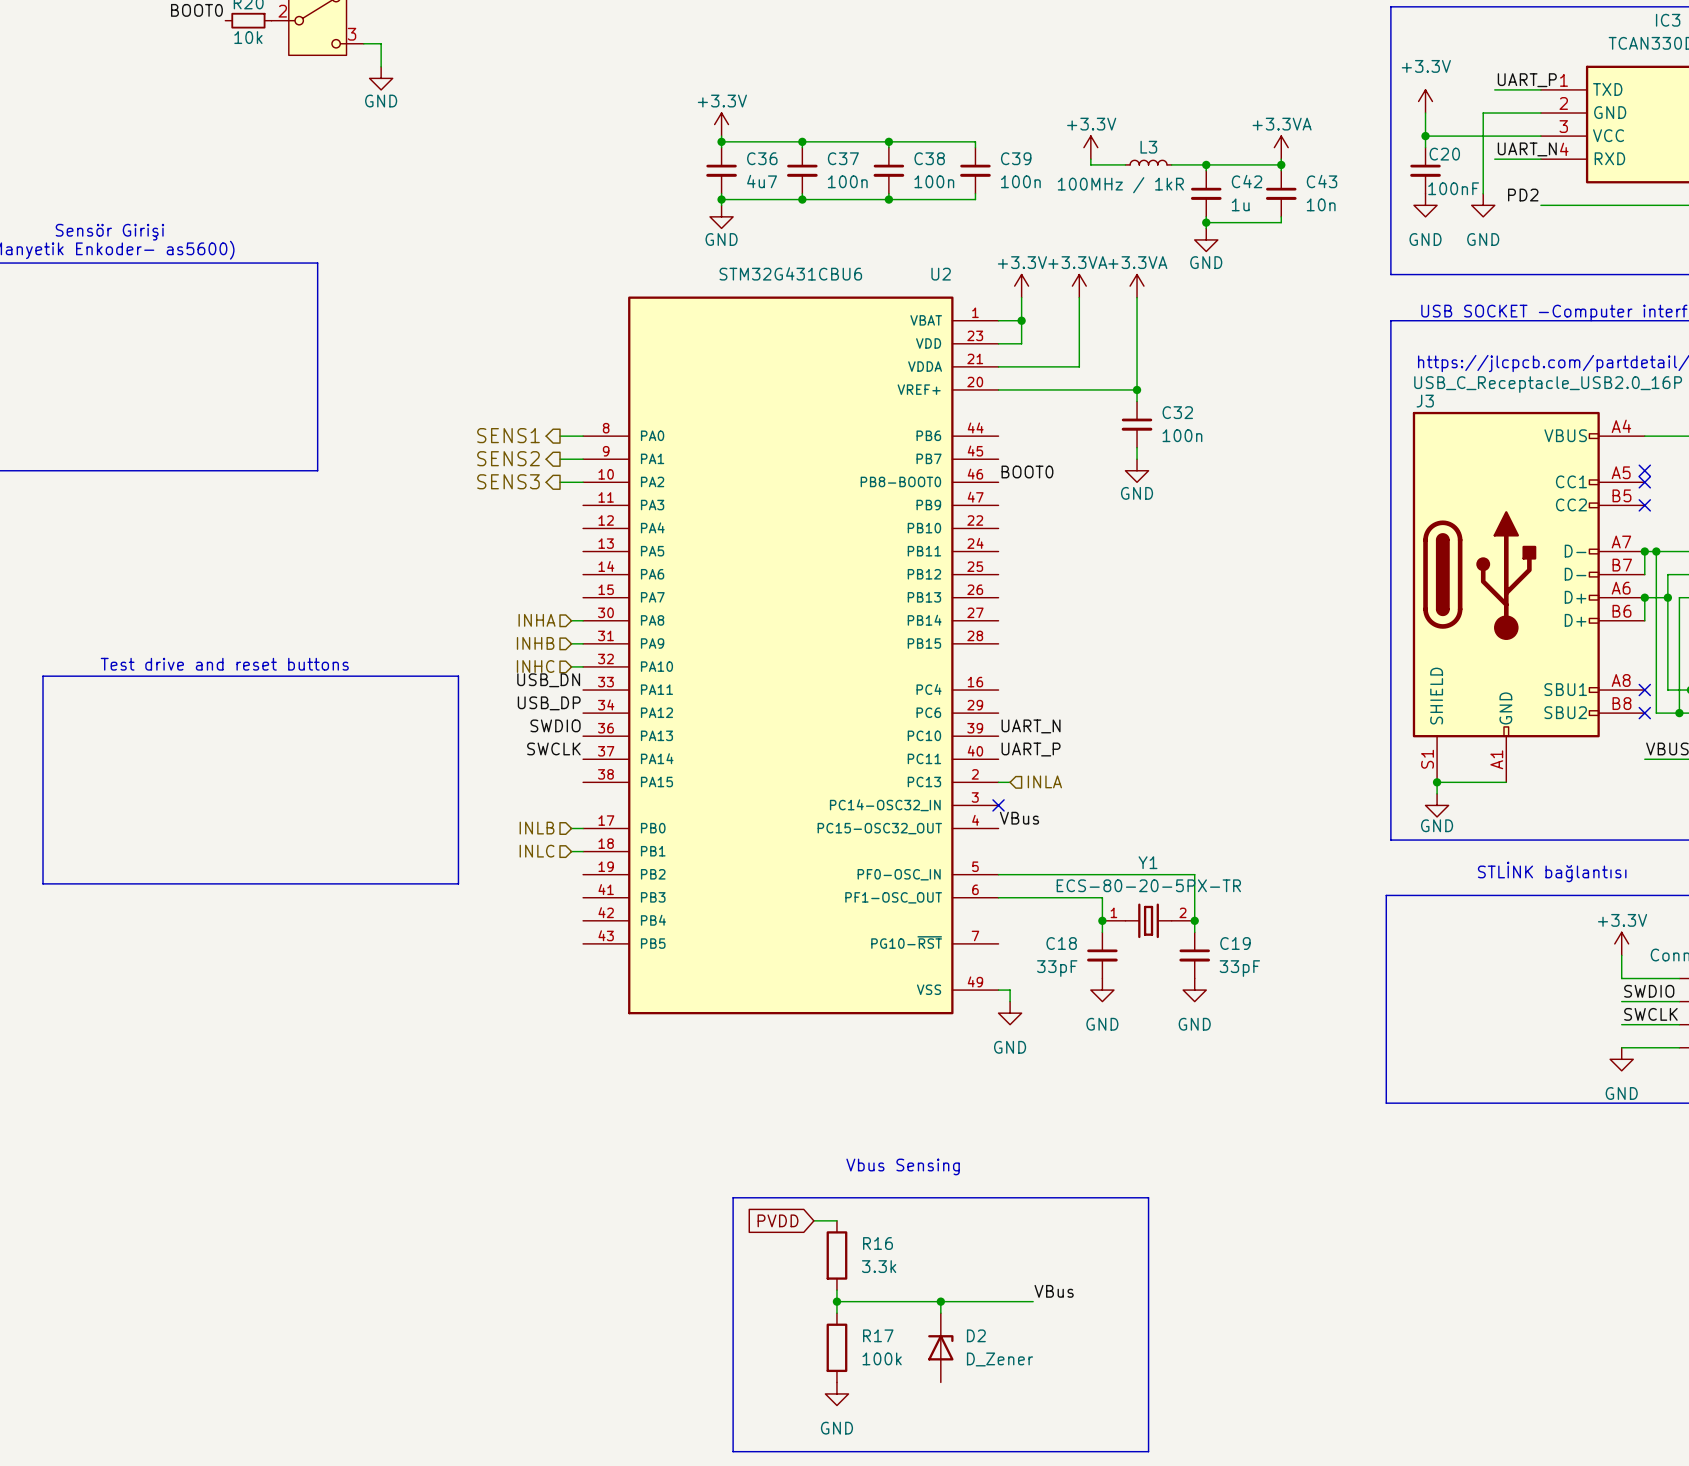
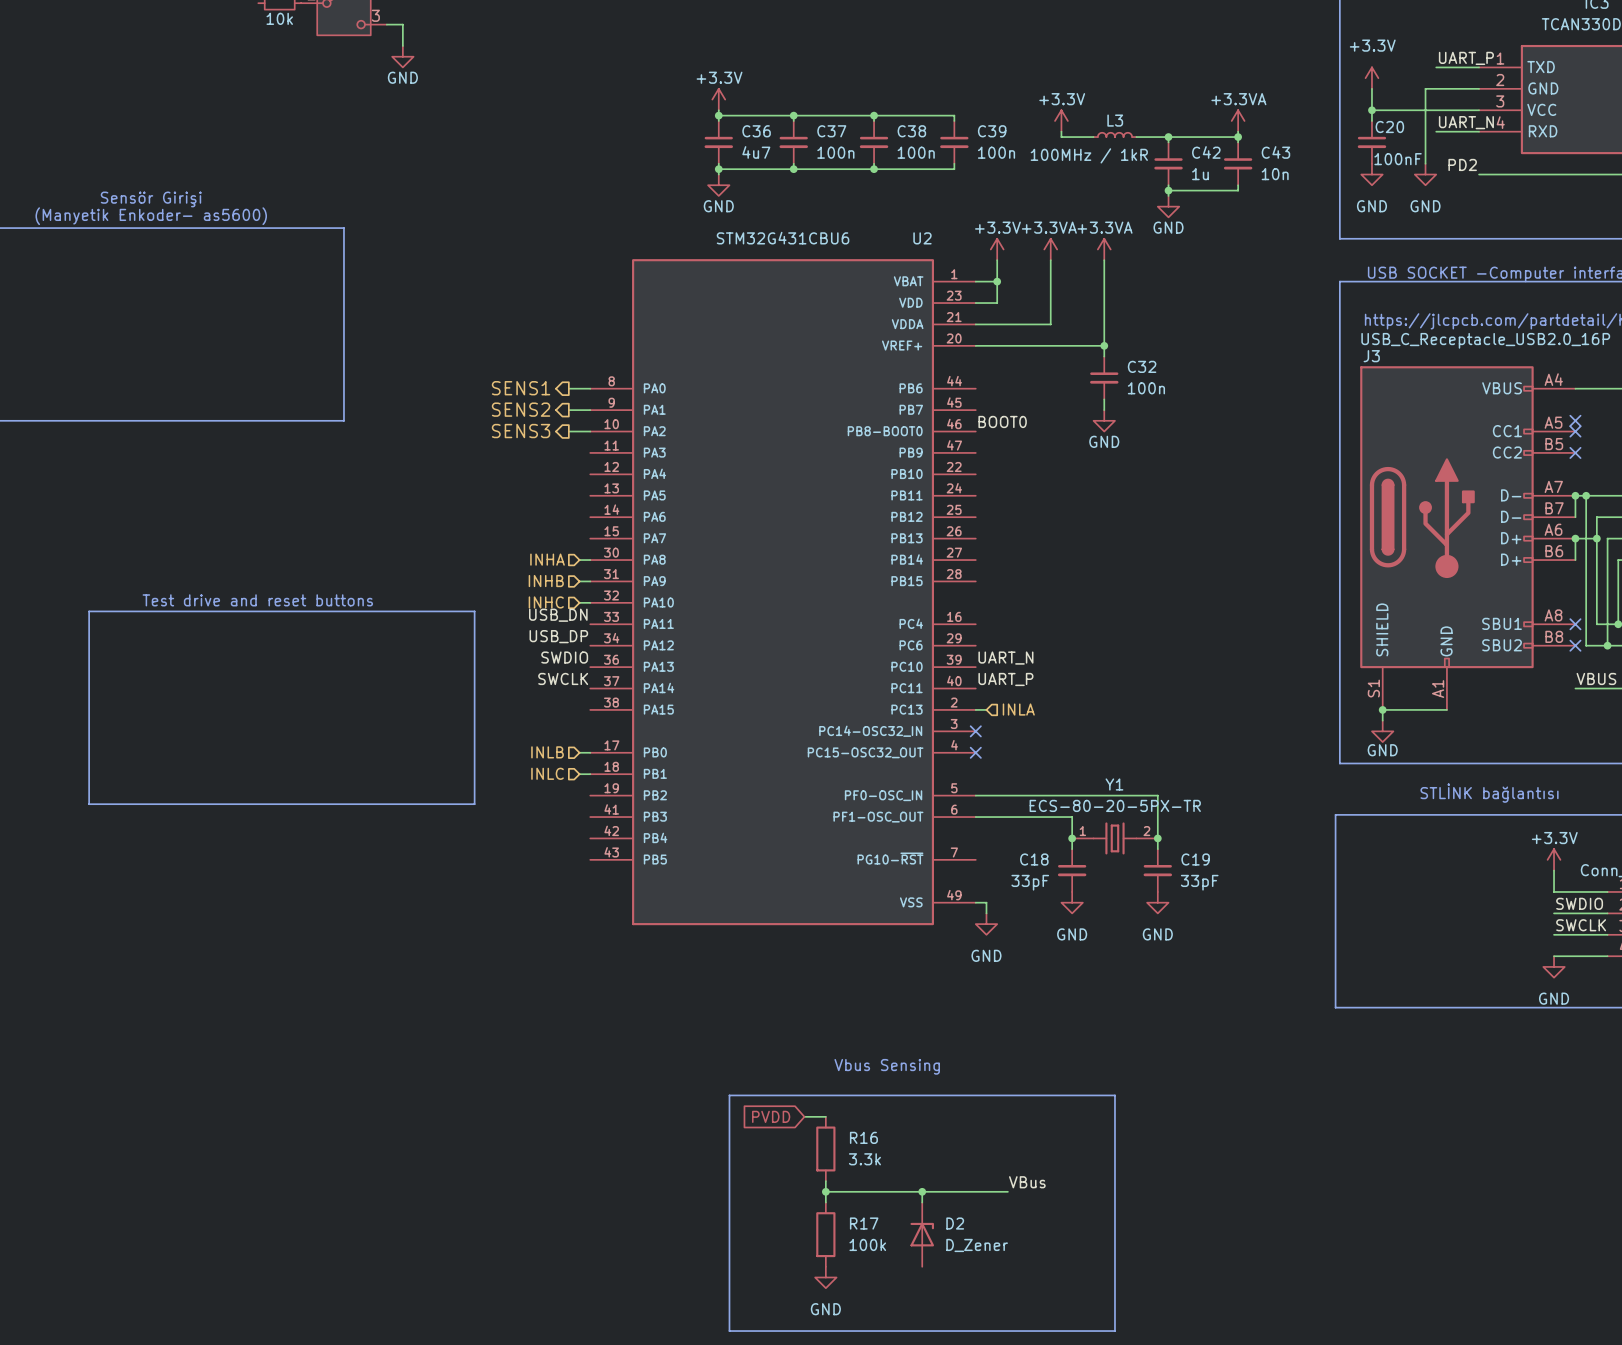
label: VBus (1019, 818) -> none
no-connect mark: none -> (975, 752)

